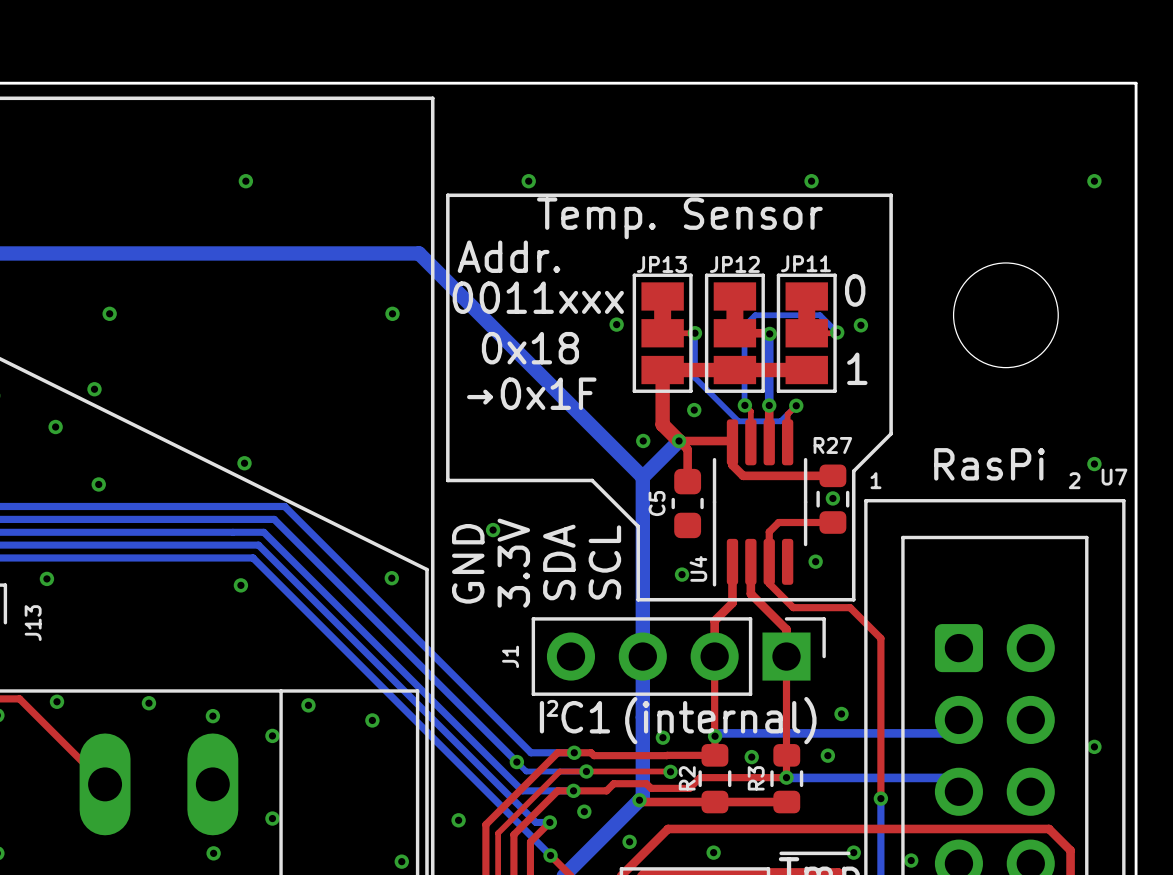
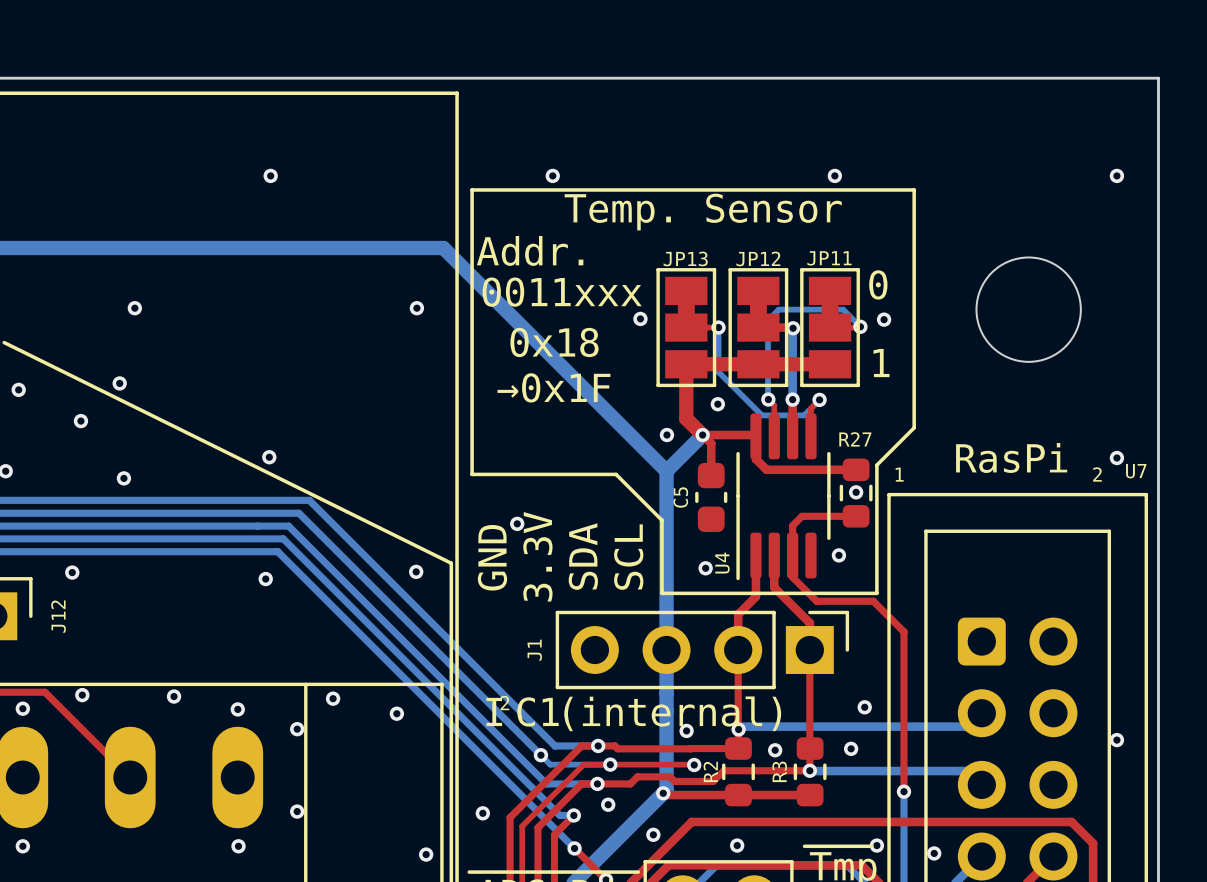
J13 name: J13 (33, 623) -> J12 (58, 616)
text position: 2 (552, 708) -> 2 (504, 703)
text position: I (541, 717) -> I (494, 711)
text position: C1 (585, 717) -> C1 (538, 711)
text position: (internal) (720, 720) -> (internal) (672, 713)

